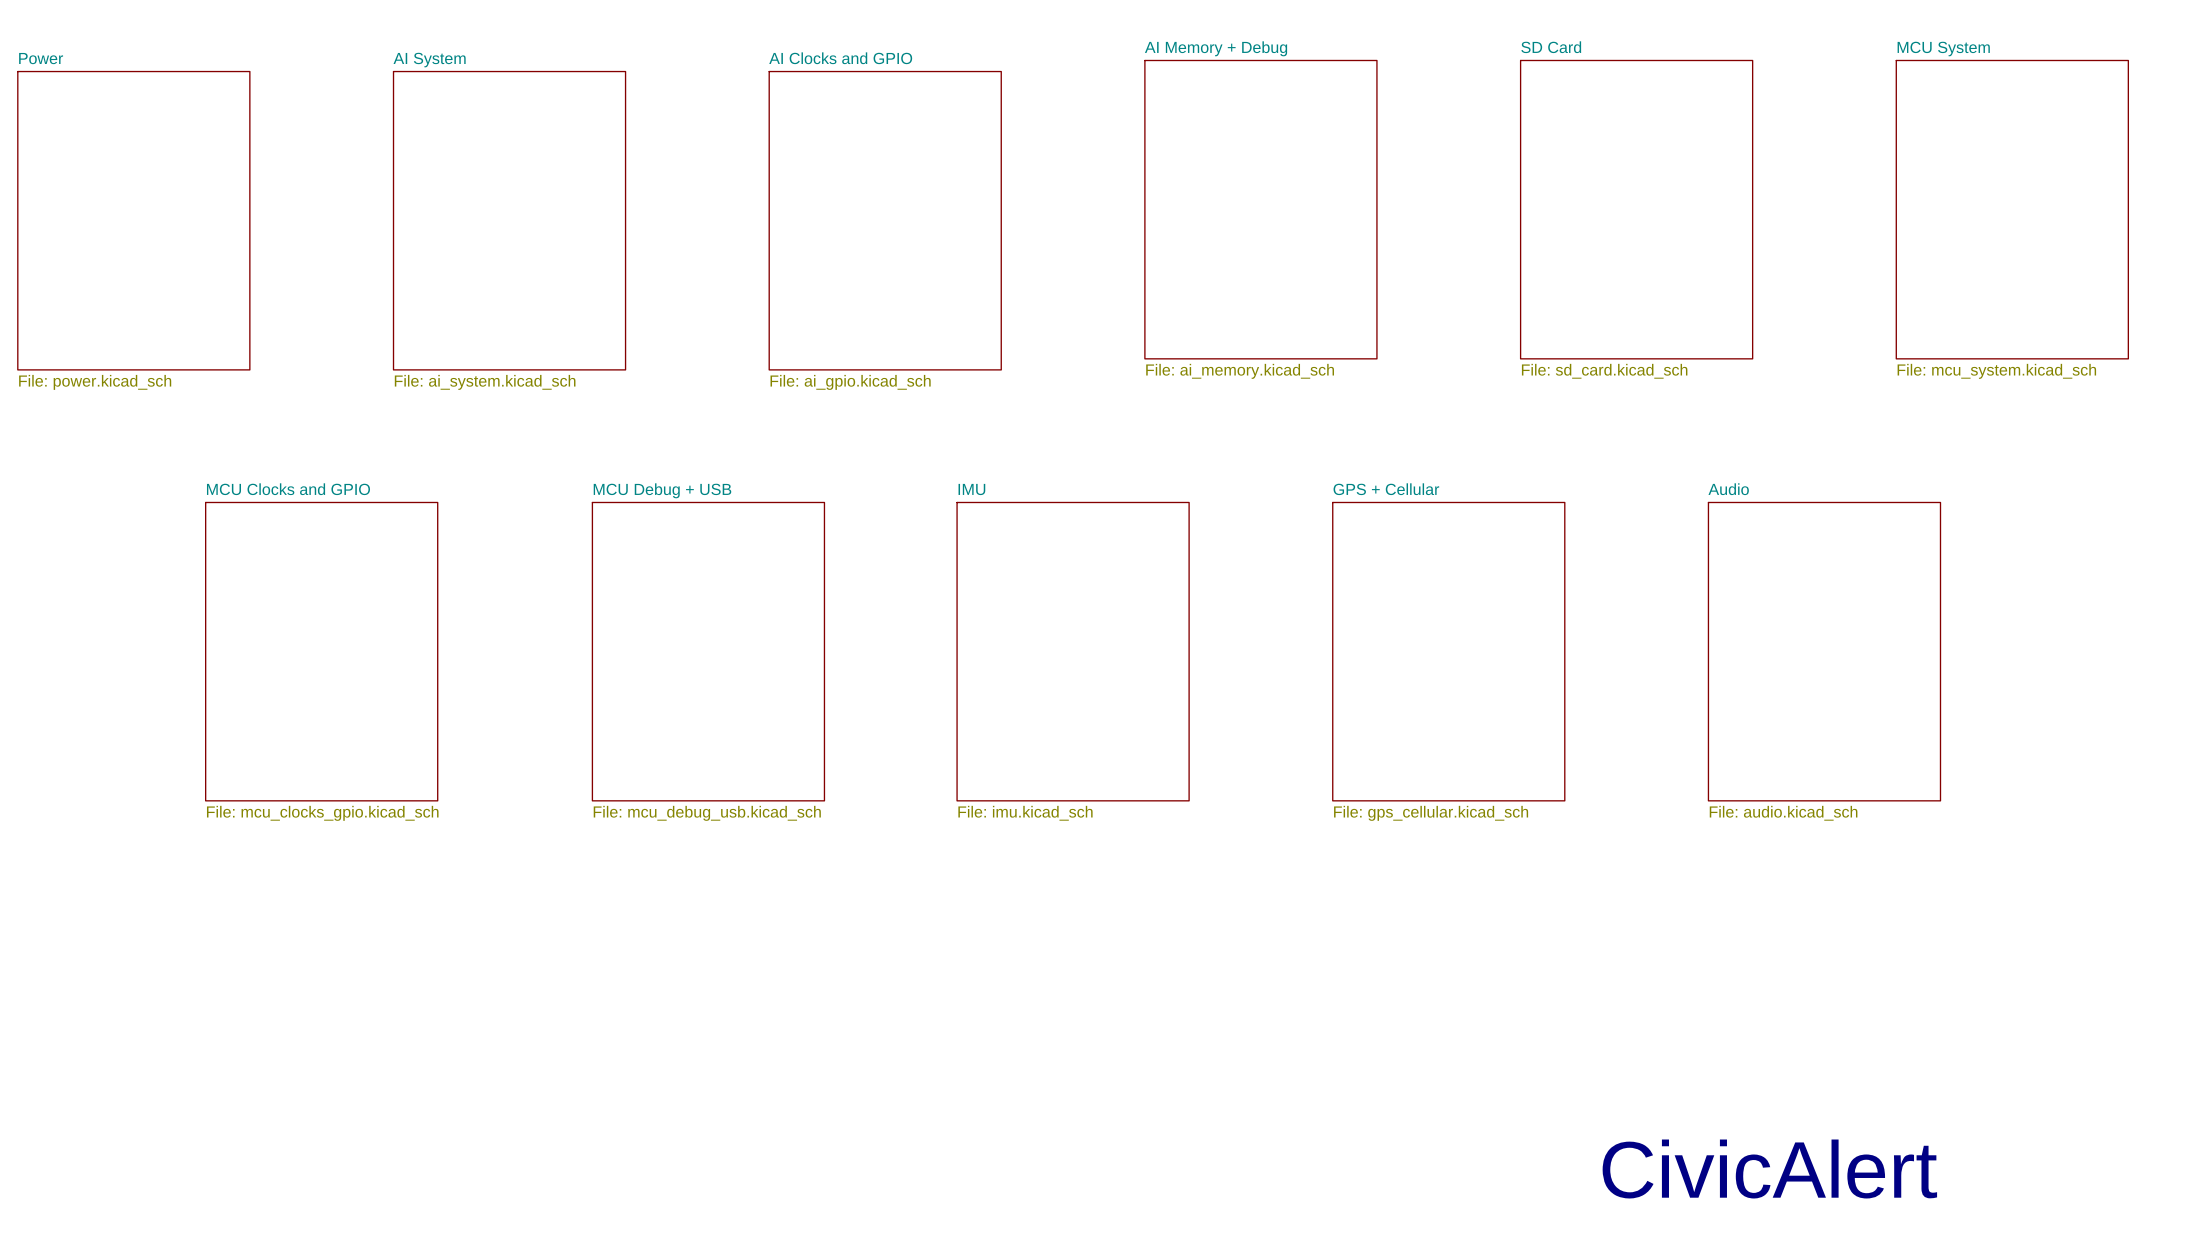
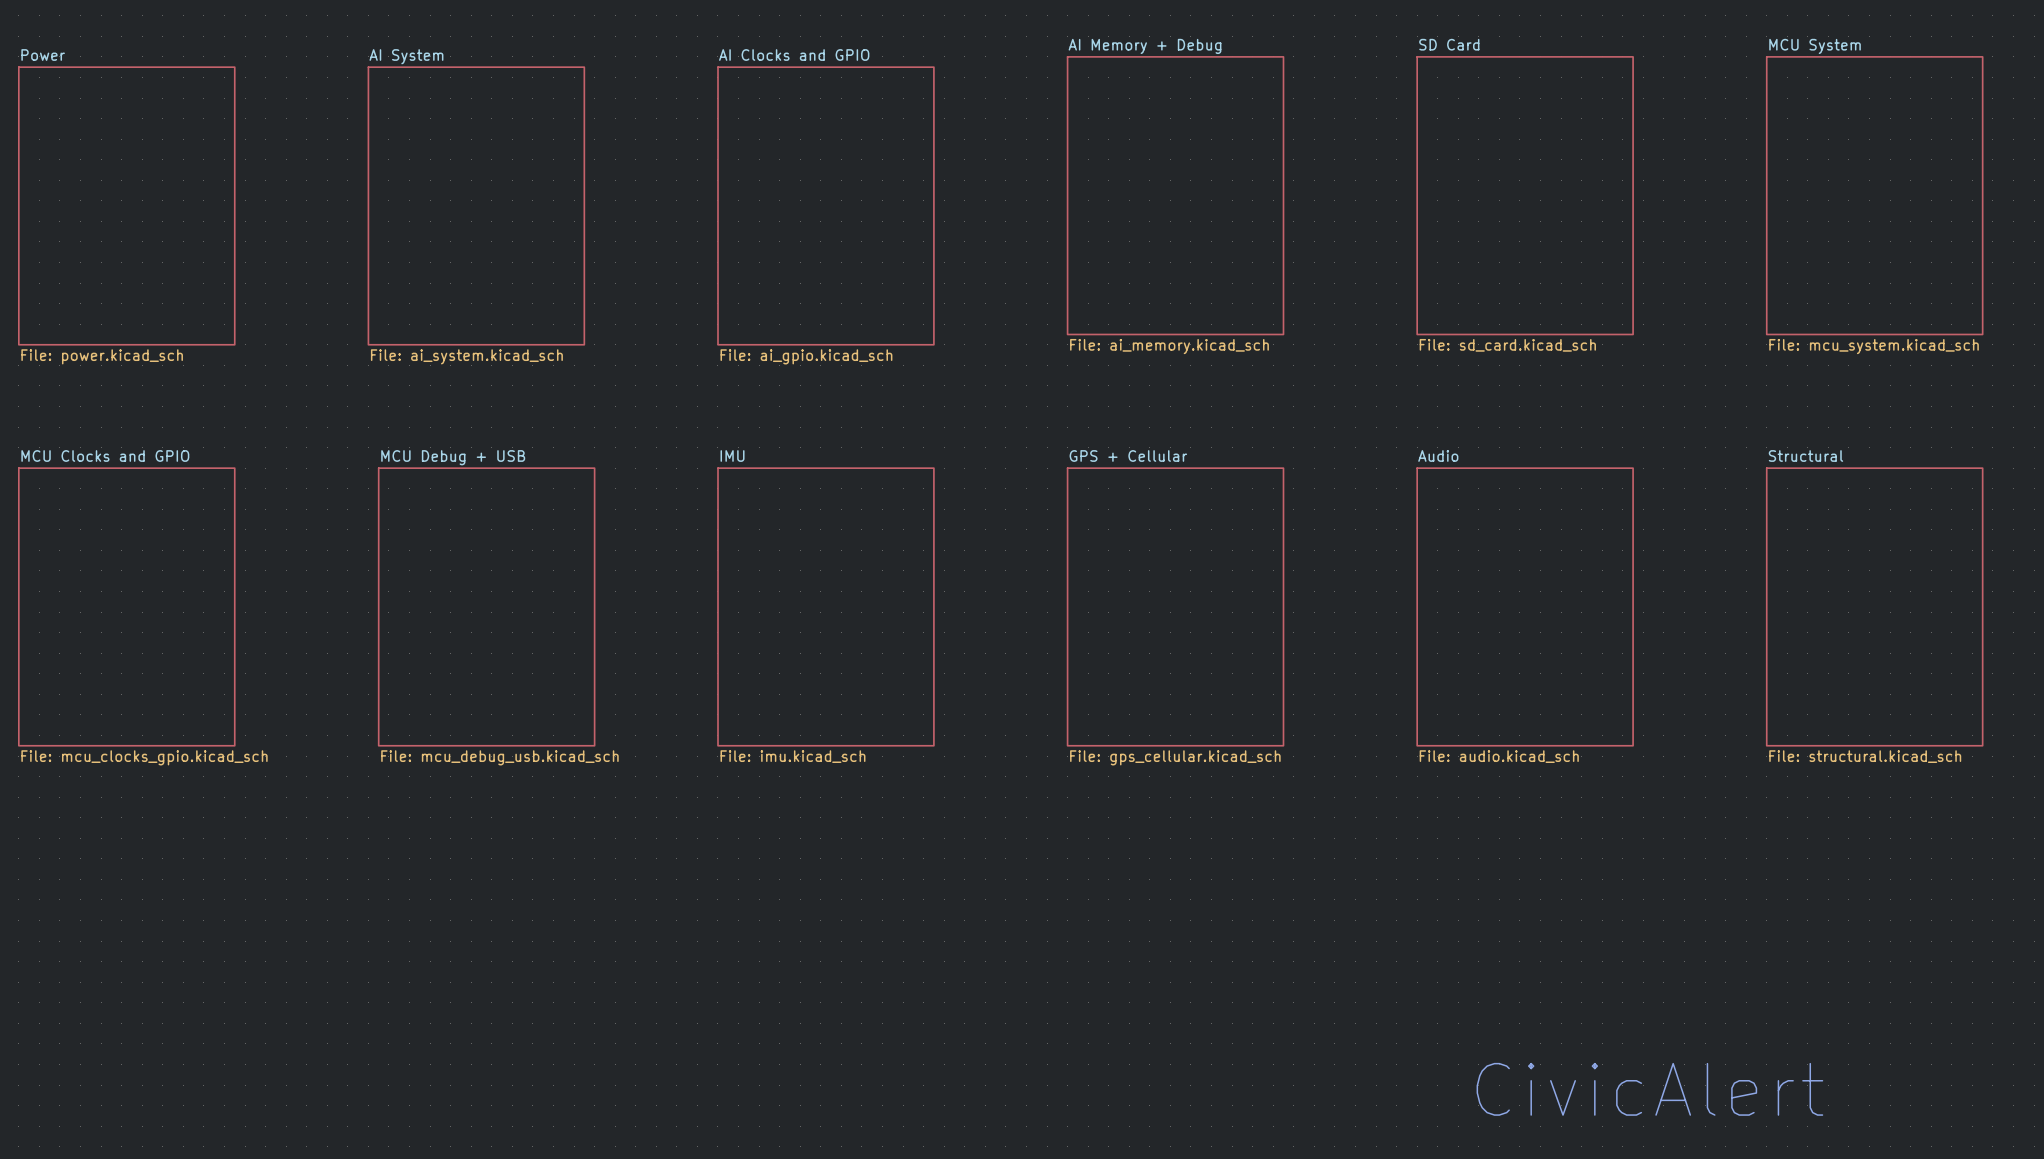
sheet MCU Clocks and GPIO position: (321, 651) -> (126, 606)
sheet MCU Debug + USB position: (708, 651) -> (486, 606)
sheet IMU position: (1073, 651) -> (825, 606)
sheet GPS + Cellular position: (1448, 651) -> (1175, 606)
sheet Audio position: (1824, 651) -> (1525, 606)
sheet Structural: none -> File: structural.kicad_sch (1874, 606)

